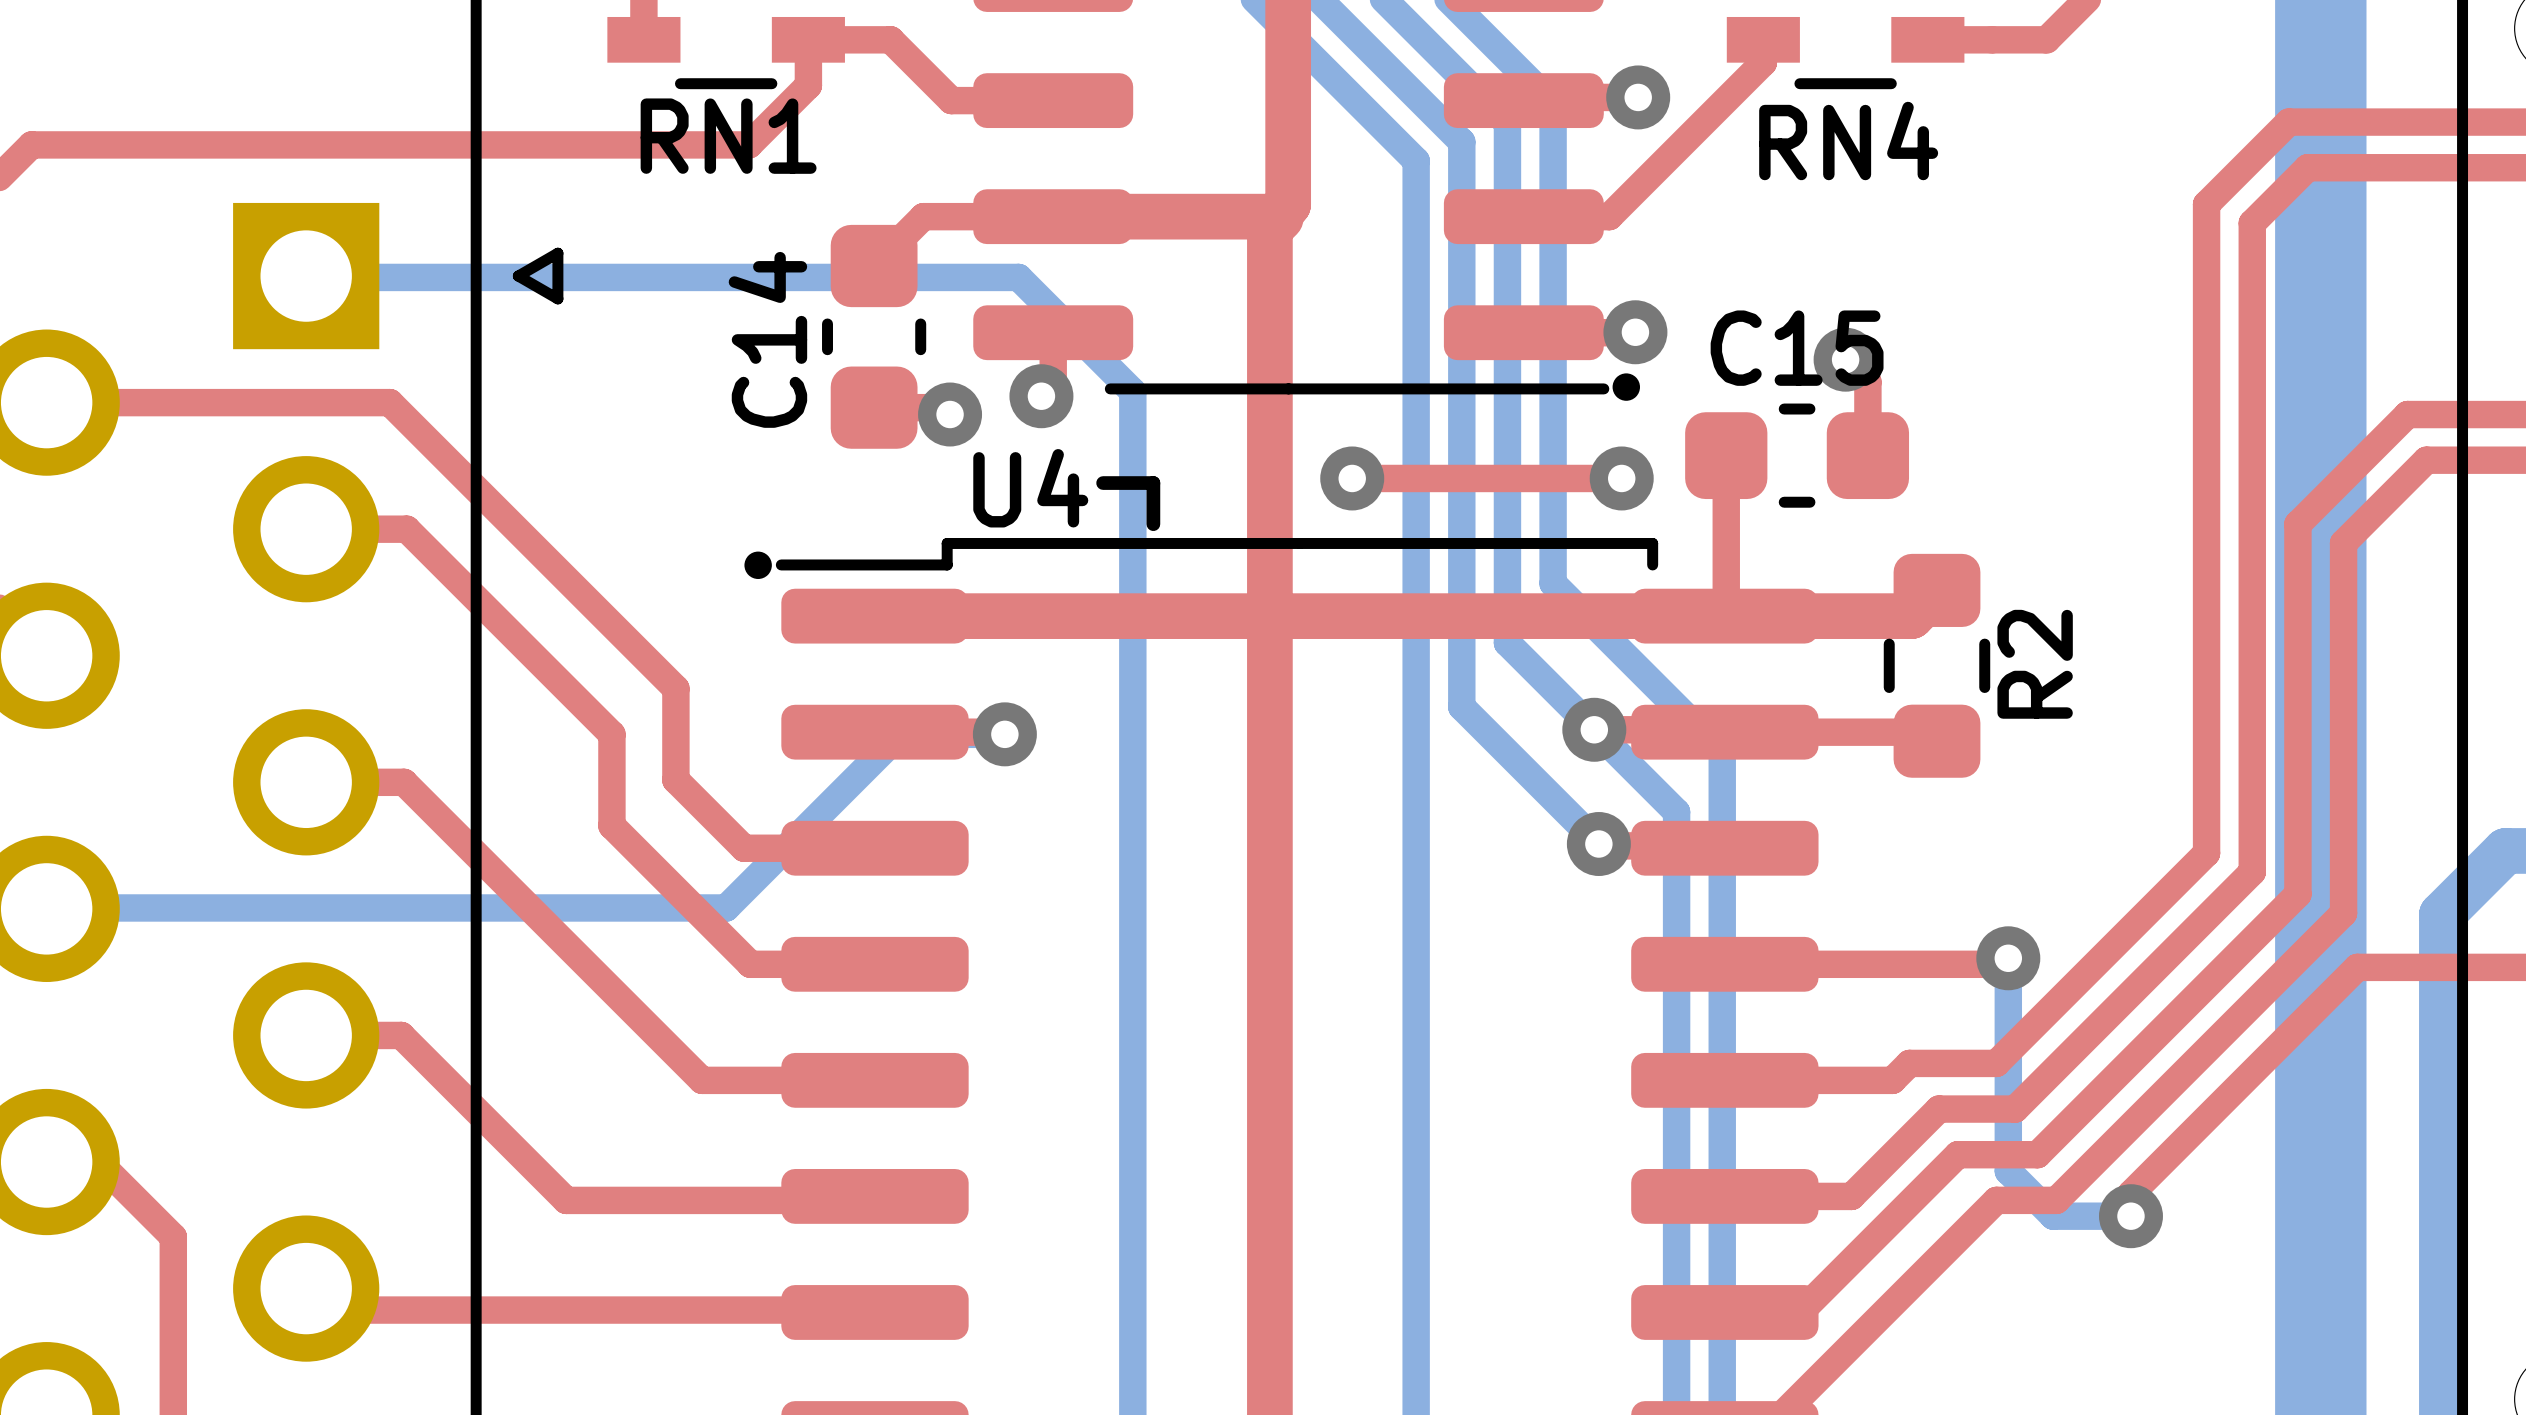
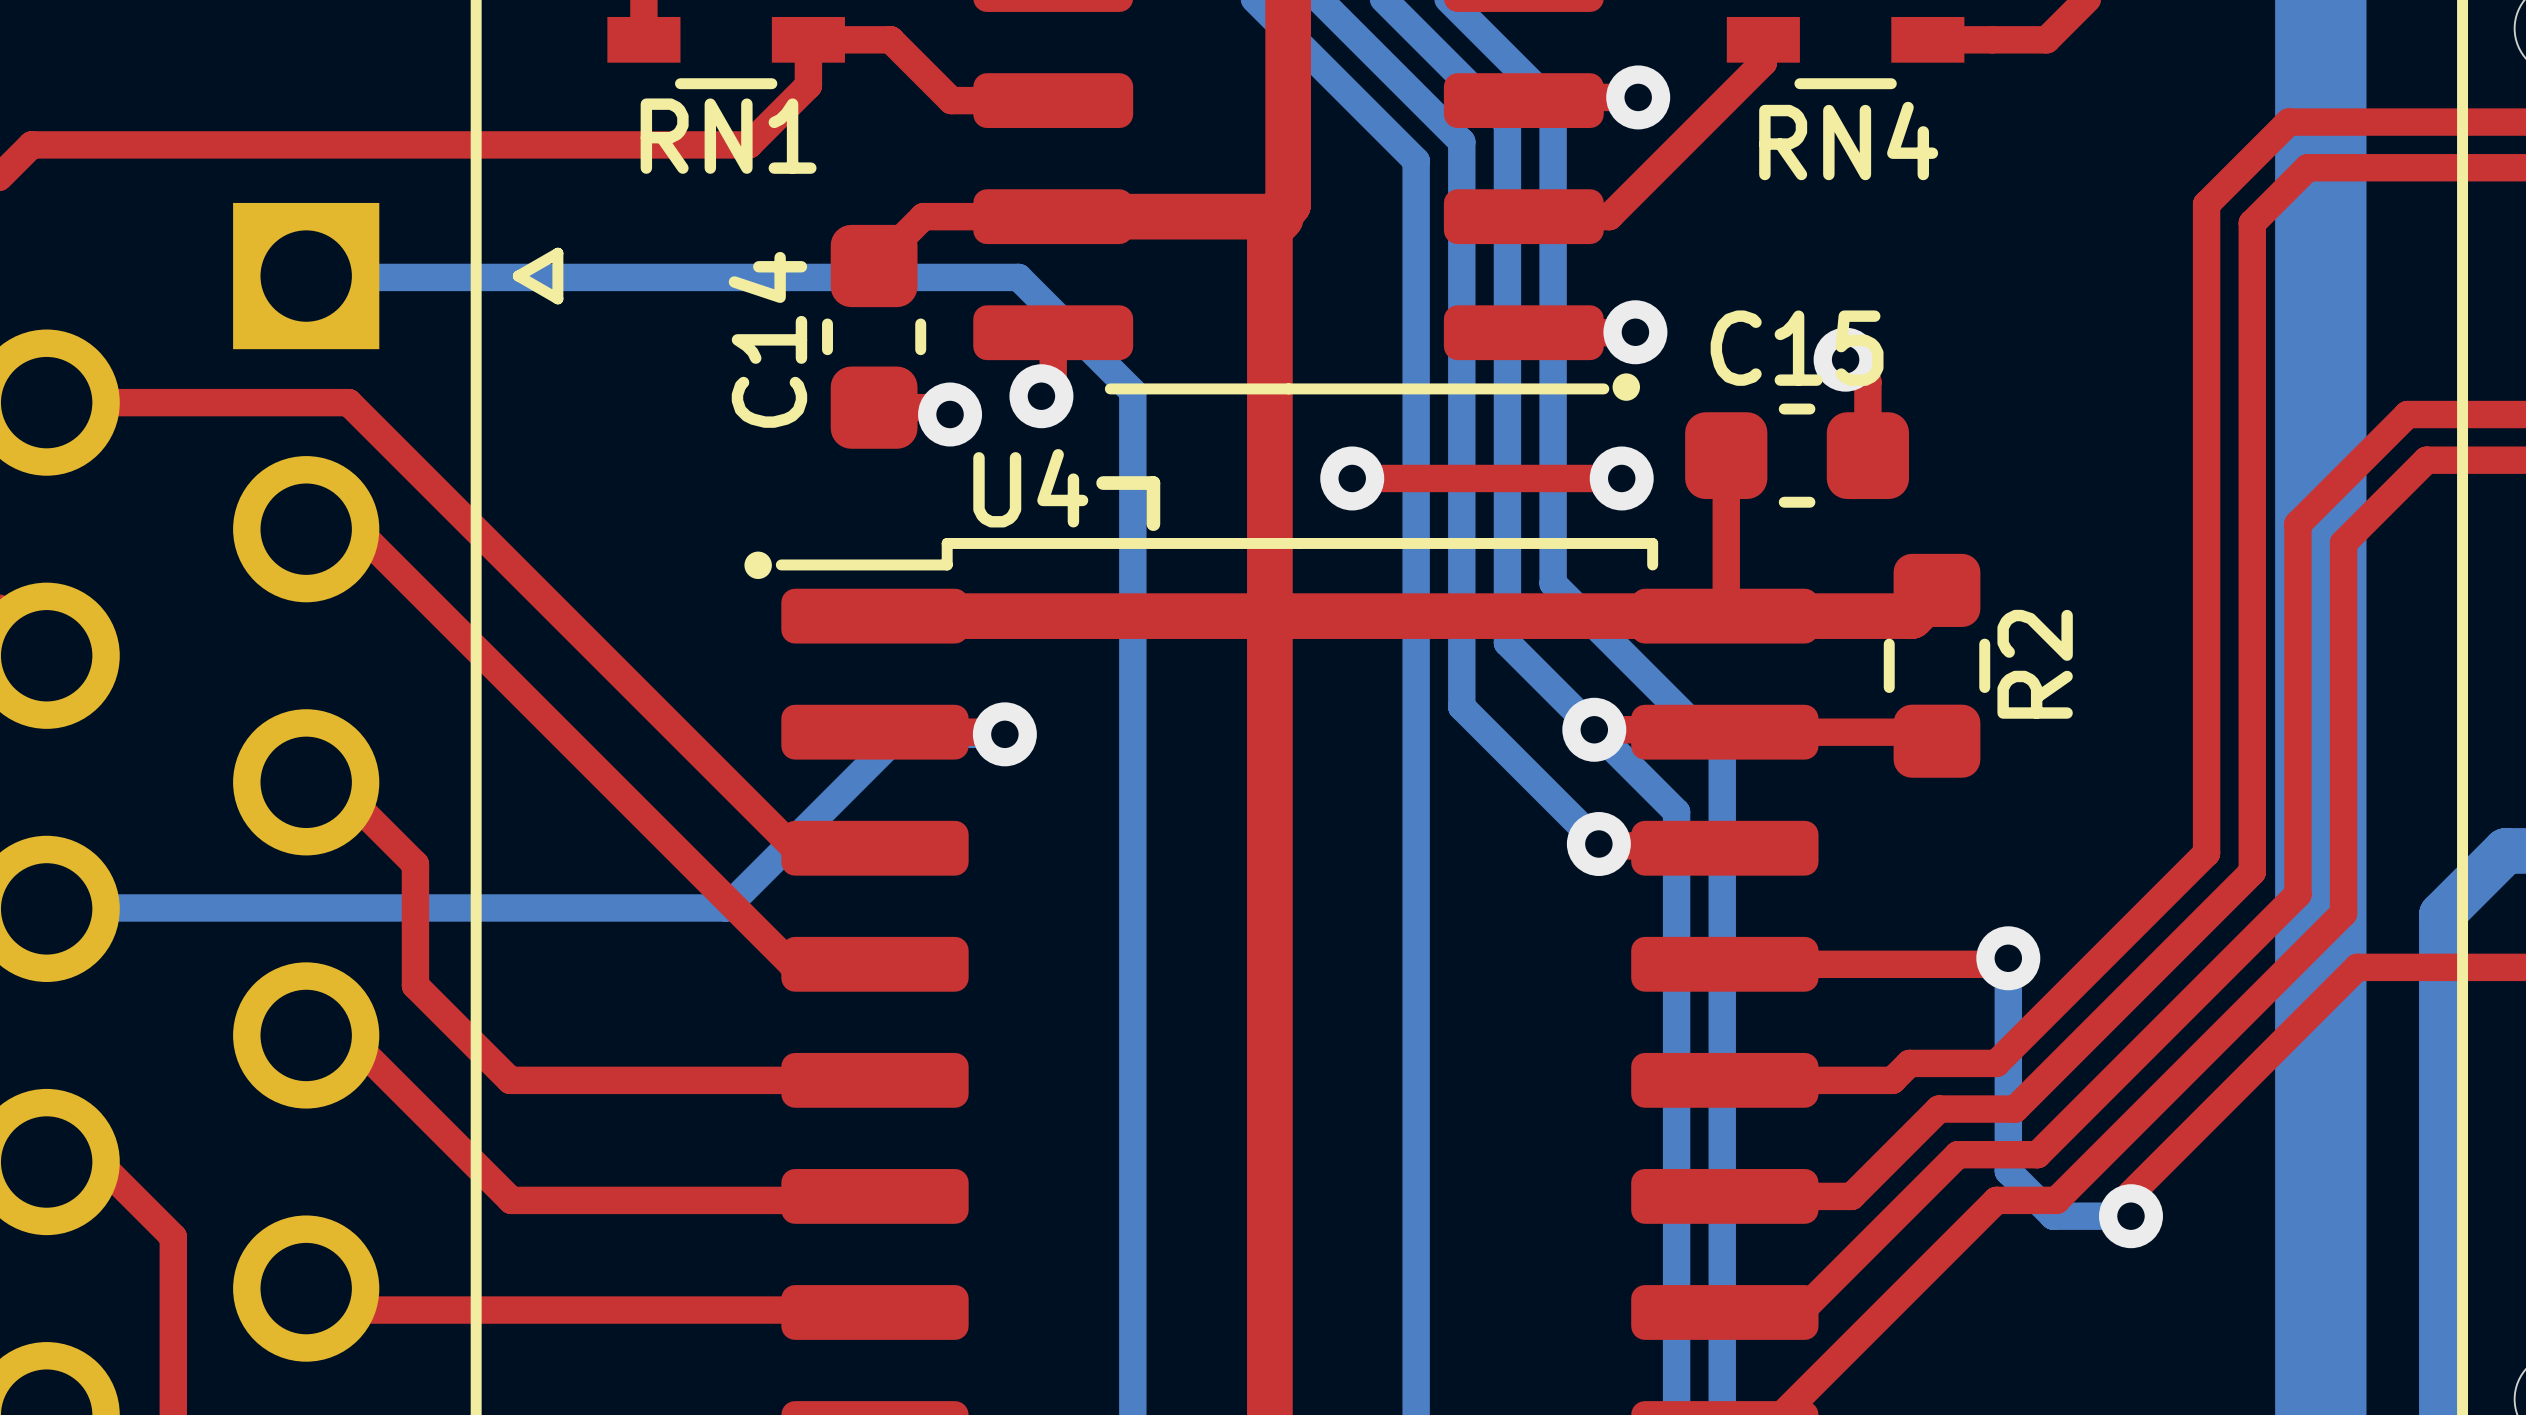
top track: (348, 402) (389, 402) (675, 688) (675, 780) (744, 848) (794, 848) -> (348, 402) (794, 848)
top track: (358, 529) (406, 529) (611, 734) (611, 825) (750, 964) (791, 964) -> (358, 529) (358, 531) (791, 964)
top track: (306, 782) (404, 782) (702, 1080) -> (333, 782) (415, 864) (415, 985) (510, 1080) (702, 1080)
top track: (346, 1035) (401, 1035) (566, 1200) -> (346, 1035) (511, 1200) (566, 1200)

